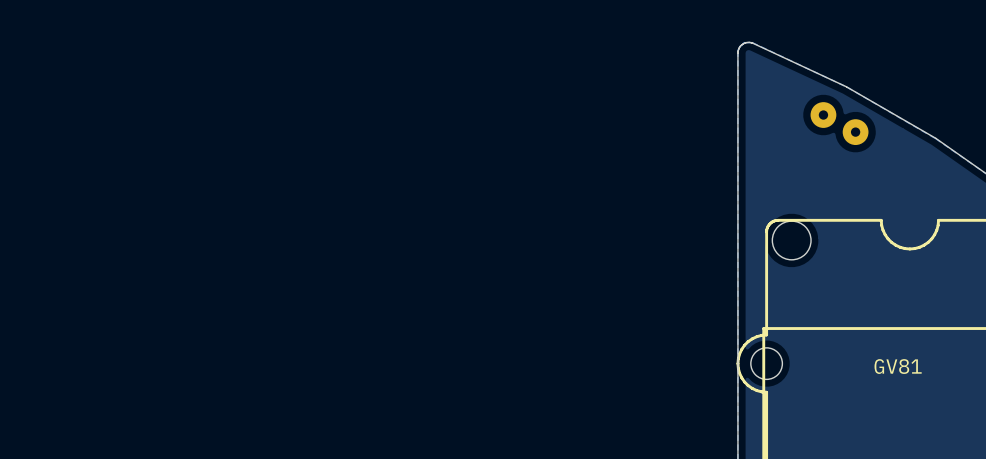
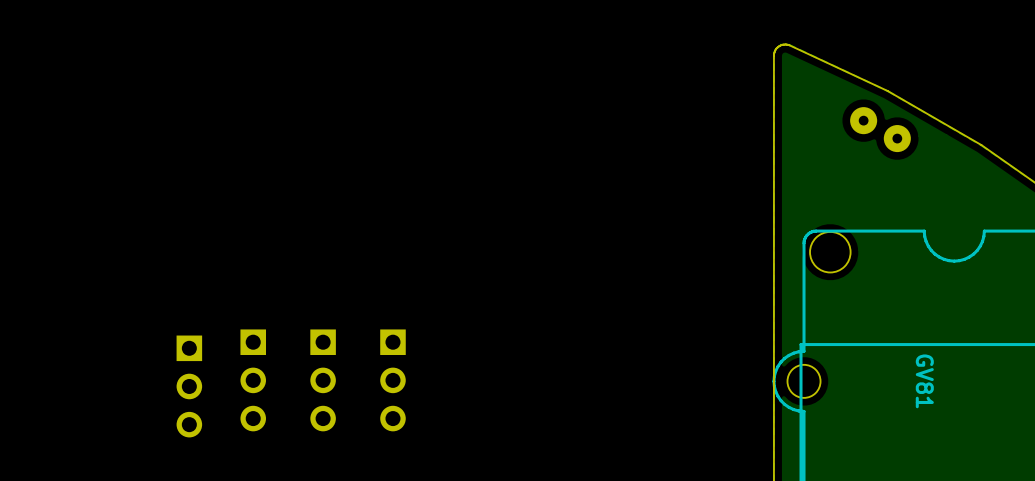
part: none -> (253, 380)
part: none -> (323, 380)
part: none -> (392, 380)
GV81 name rotation: 0° (898, 366) -> 90° clockwise (924, 381)
part: none -> (189, 386)

